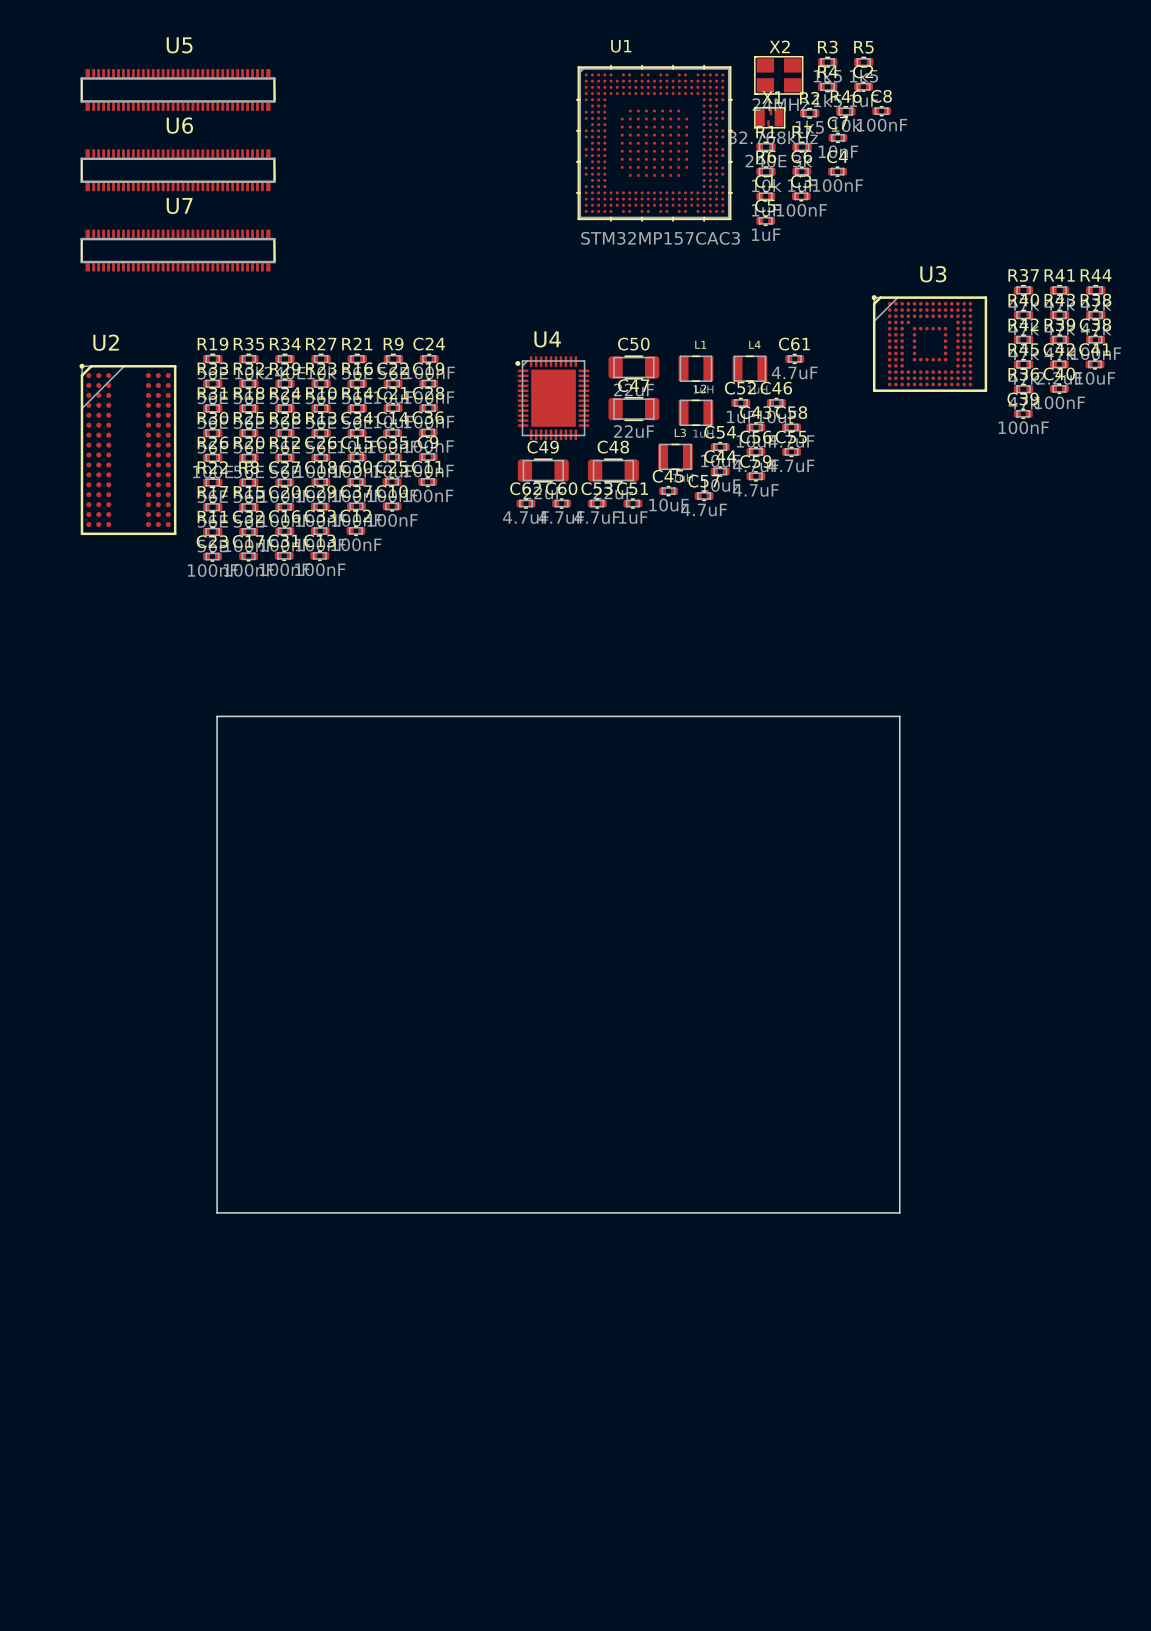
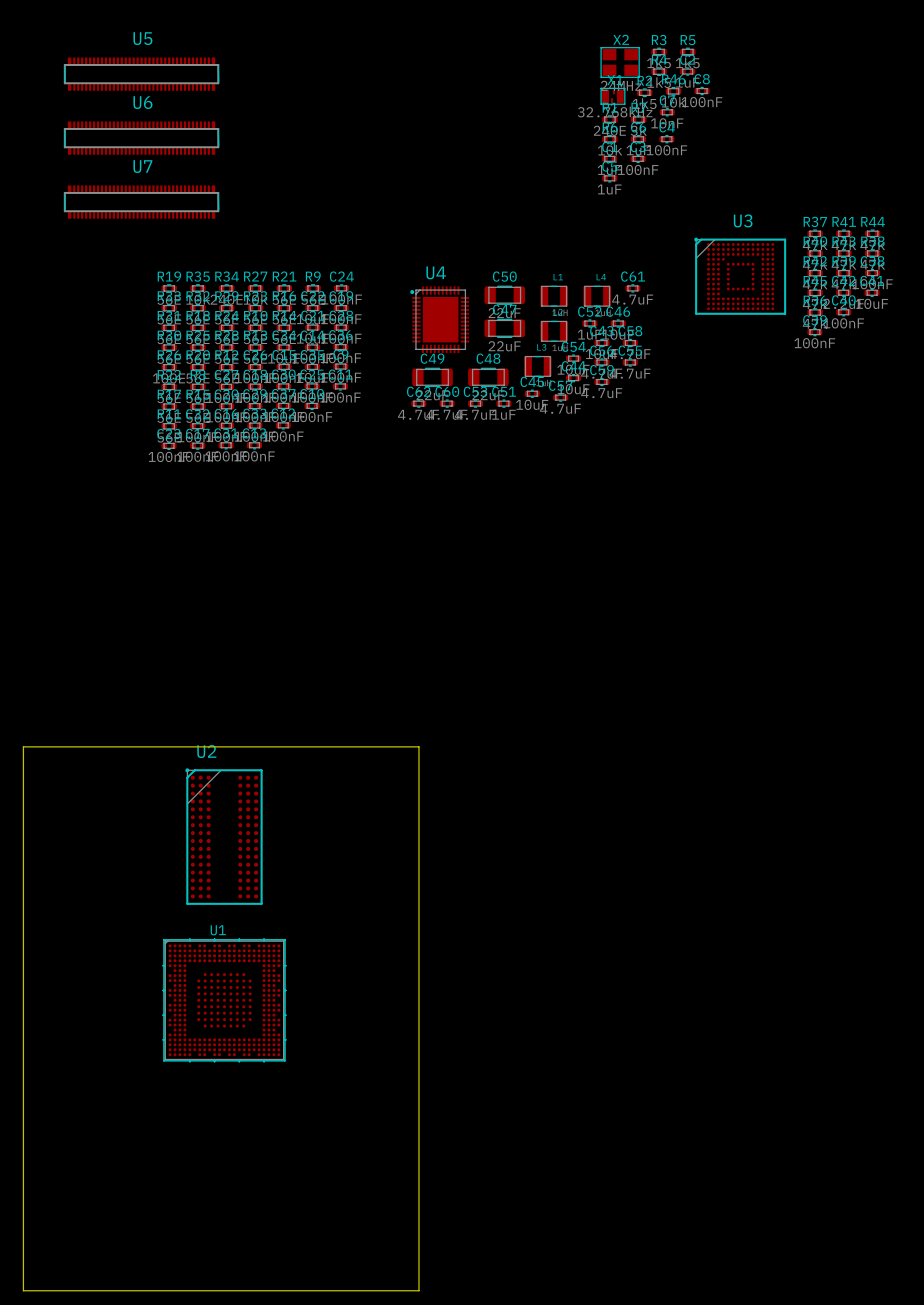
U1 name position: U1 (621, 46) -> U1 (218, 930)
U1 footprint: [575, 64, 734, 222] -> [161, 937, 288, 1063]
U1 value: STM32MP157CAC3 (660, 238) -> none
U2 position: (127, 449) -> (223, 836)
board edge: (217, 716) (217, 1212) (899, 1212) (899, 716) (217, 716) -> none
board edge: none -> (23, 746) (418, 746) (418, 1290) (23, 1290) (23, 746)

